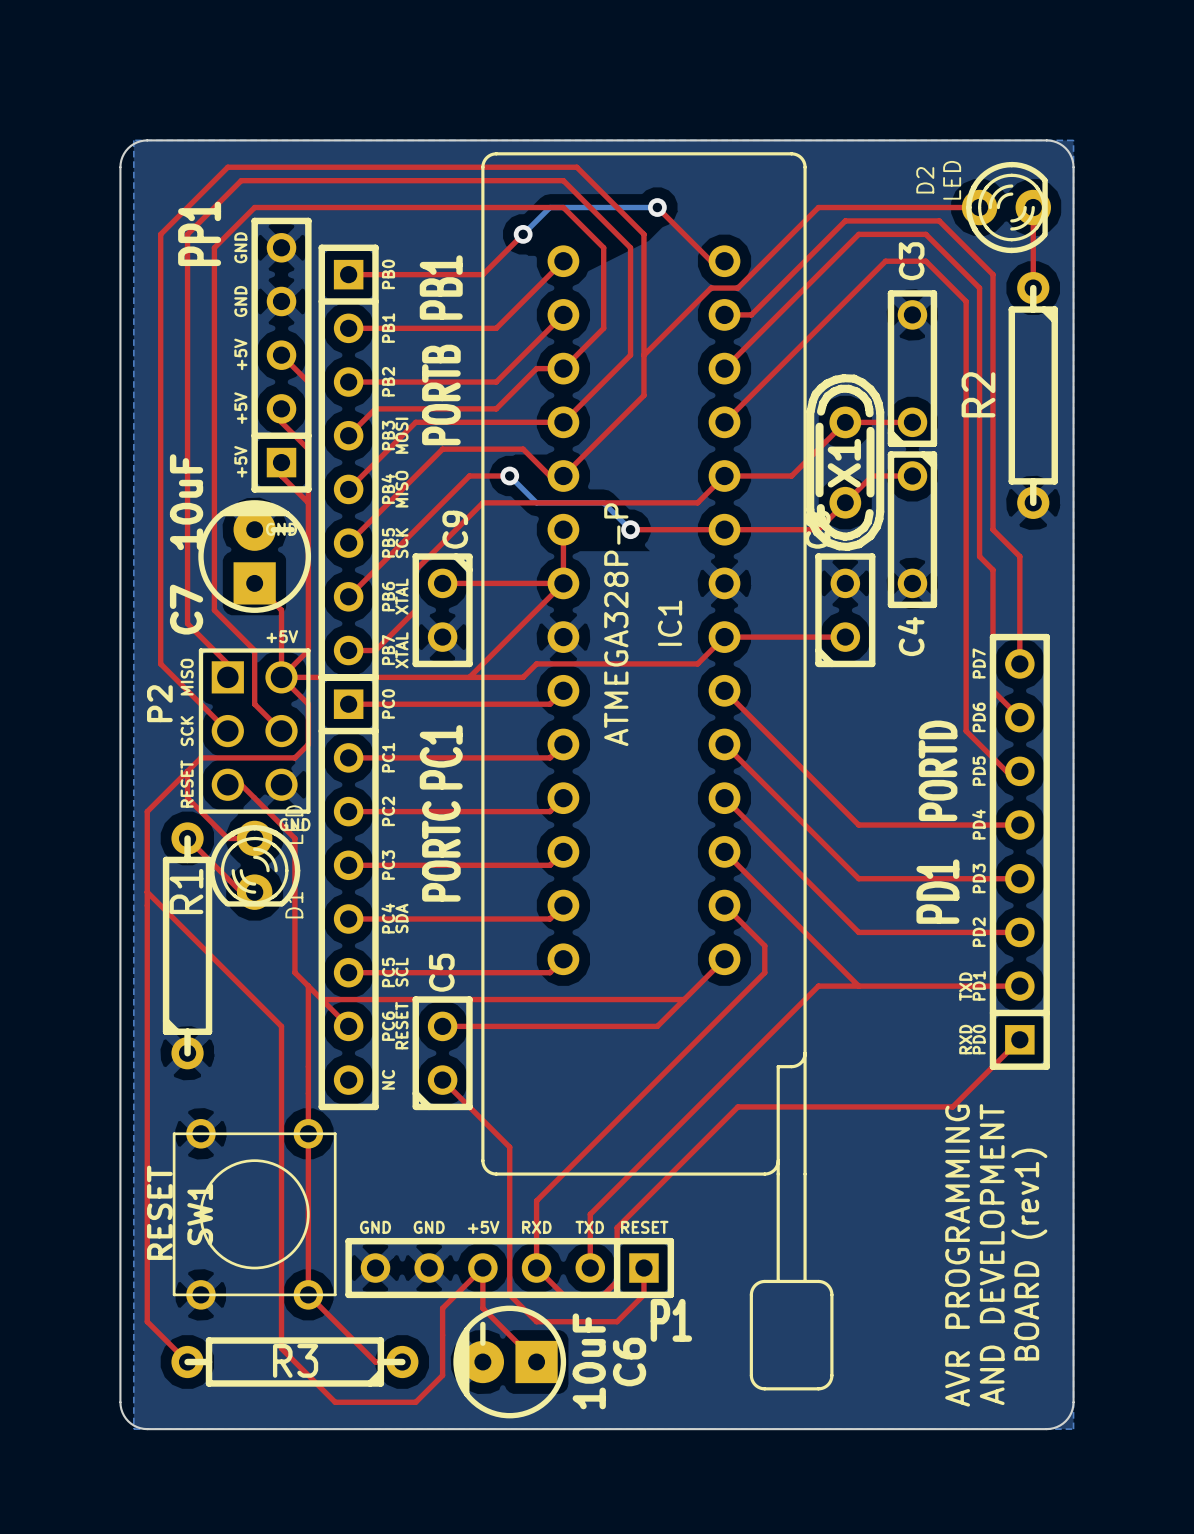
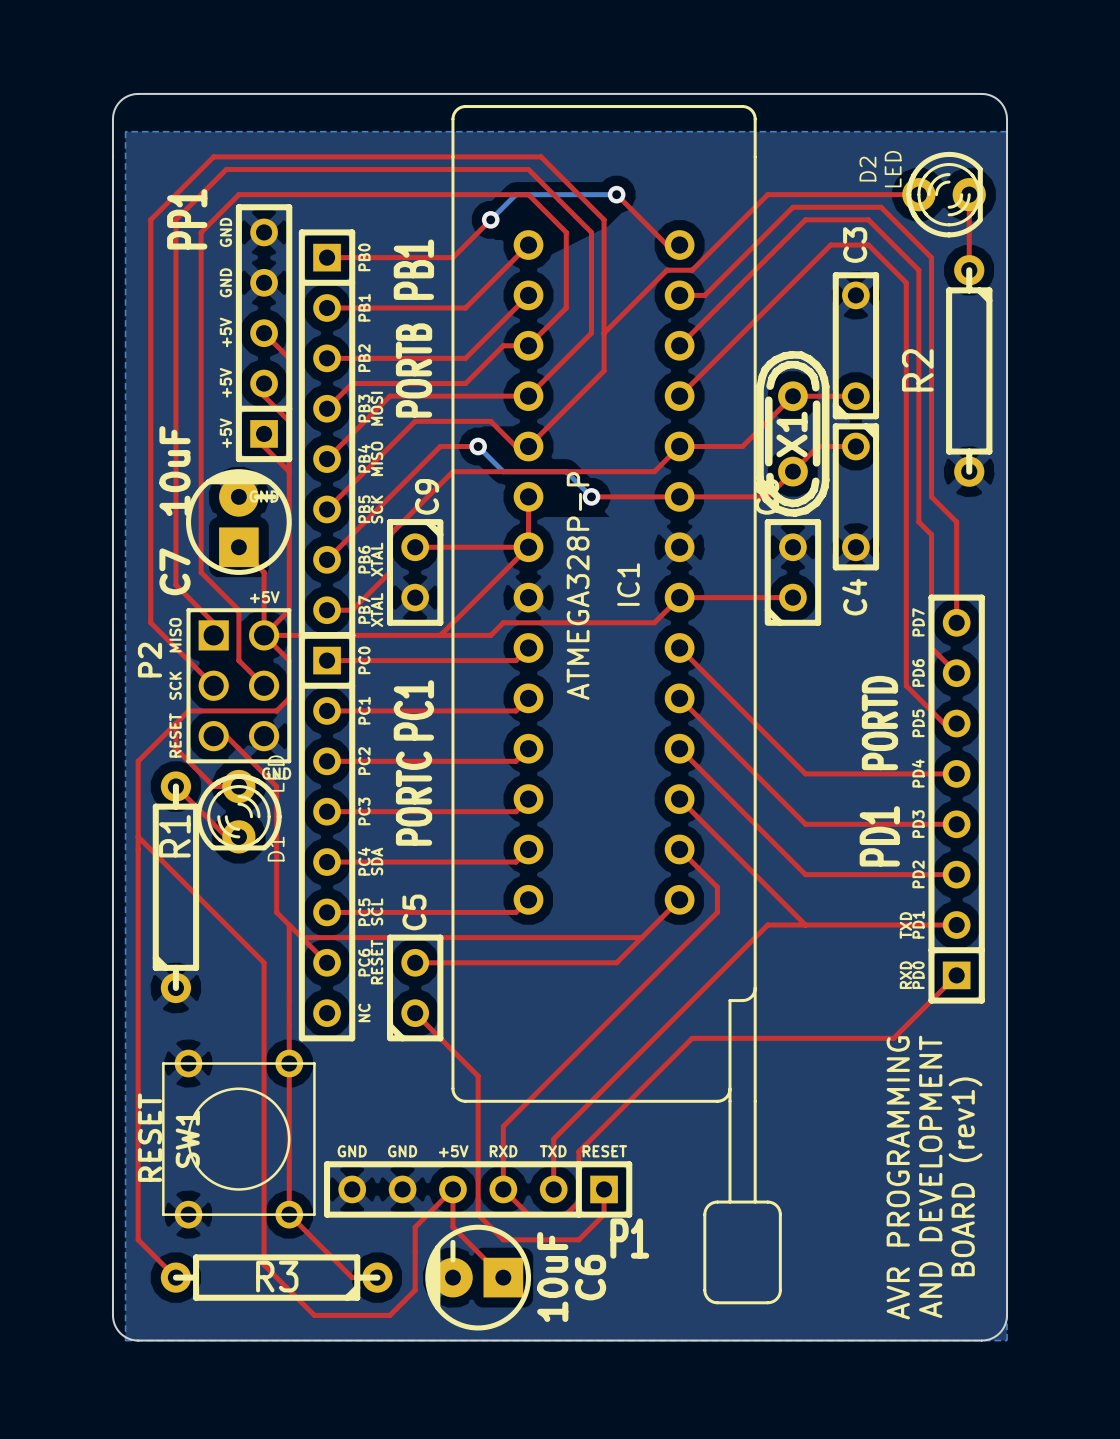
IC1 footprint: [481, 152, 834, 1391] -> [451, 105, 782, 1305]
board edge: (120, 167) (122, 156) (128, 148) (137, 142) (147, 140) (1046, 140) (1056, 142) (1065, 148) (1071, 156) (1073, 167) -> (112, 156) (112, 119) (114, 109) (125, 97) (138, 93) (985, 94) (997, 99) (1005, 109) (1007, 119) (1007, 156)

